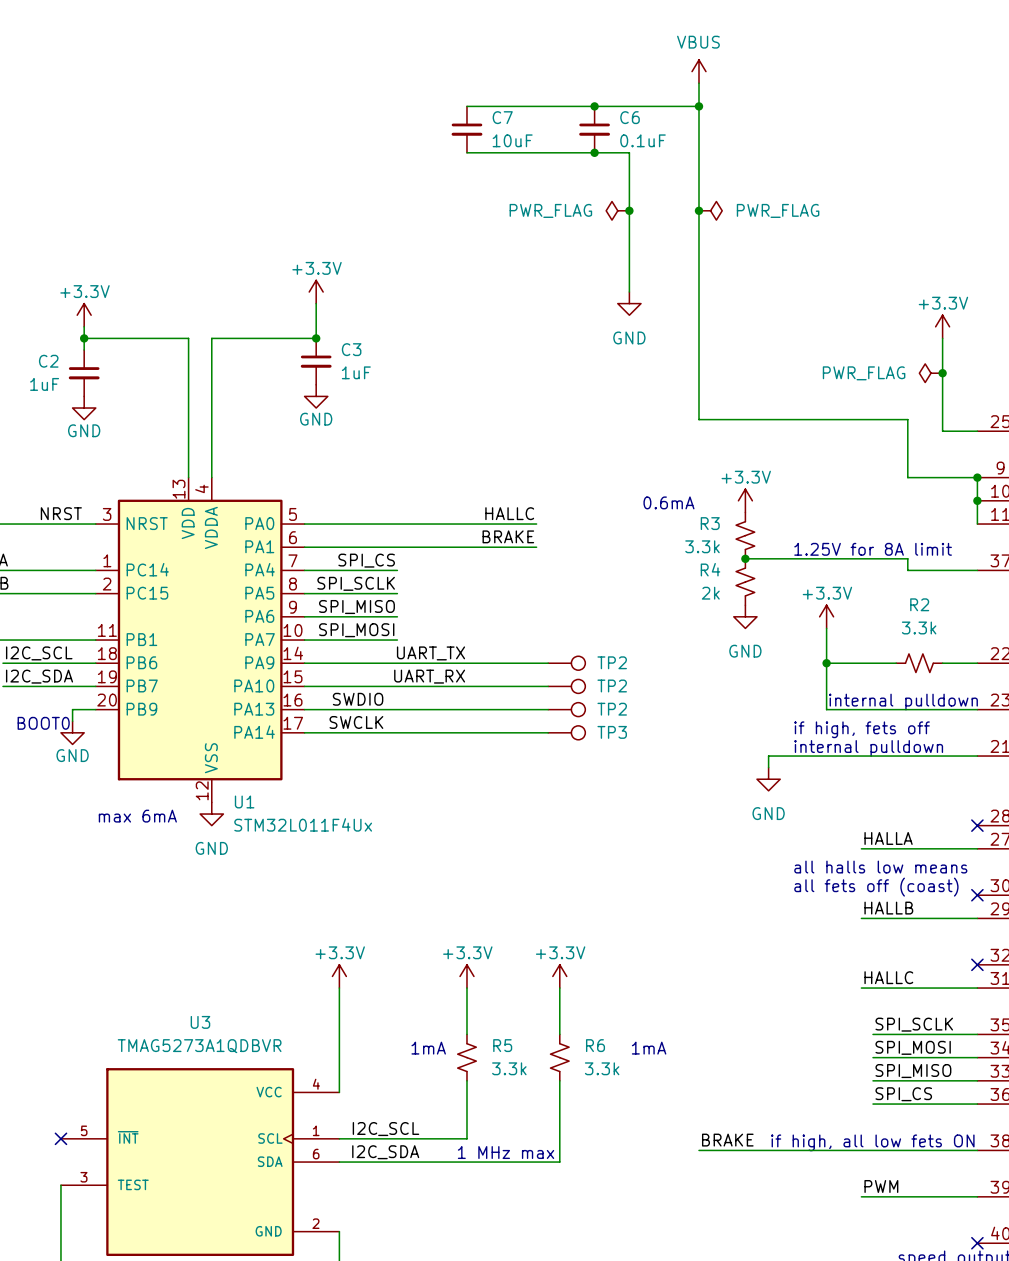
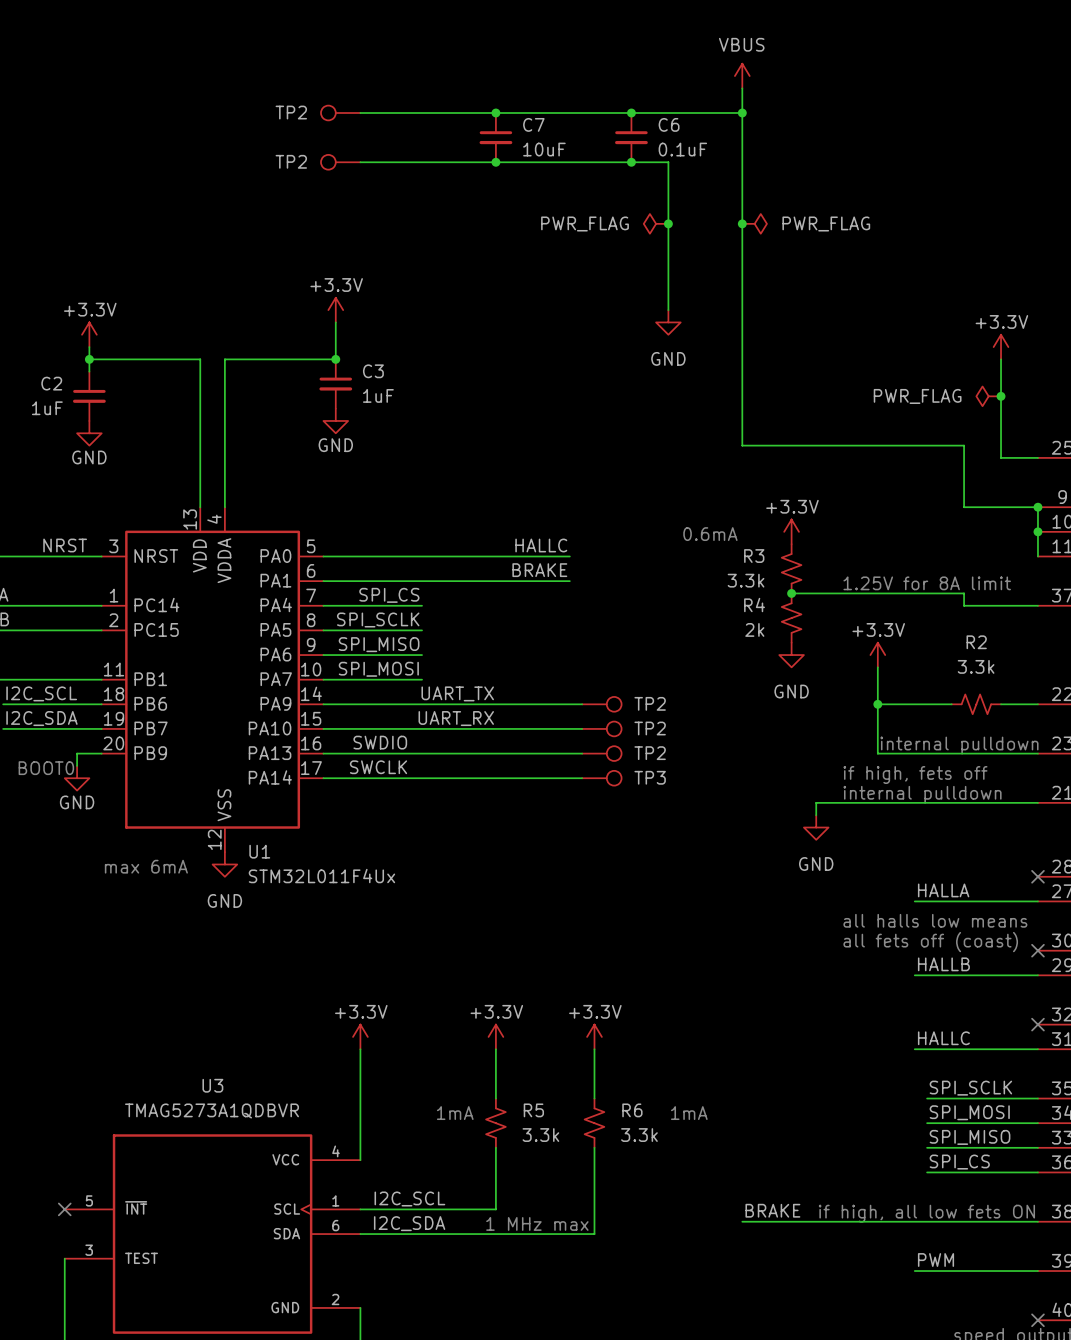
TP2: none -> (340, 112)
wire: none -> (360, 112) (495, 112)
junction: none -> (495, 112)
TP2: none -> (340, 162)
wire: none -> (360, 162) (495, 162)
junction: none -> (495, 162)

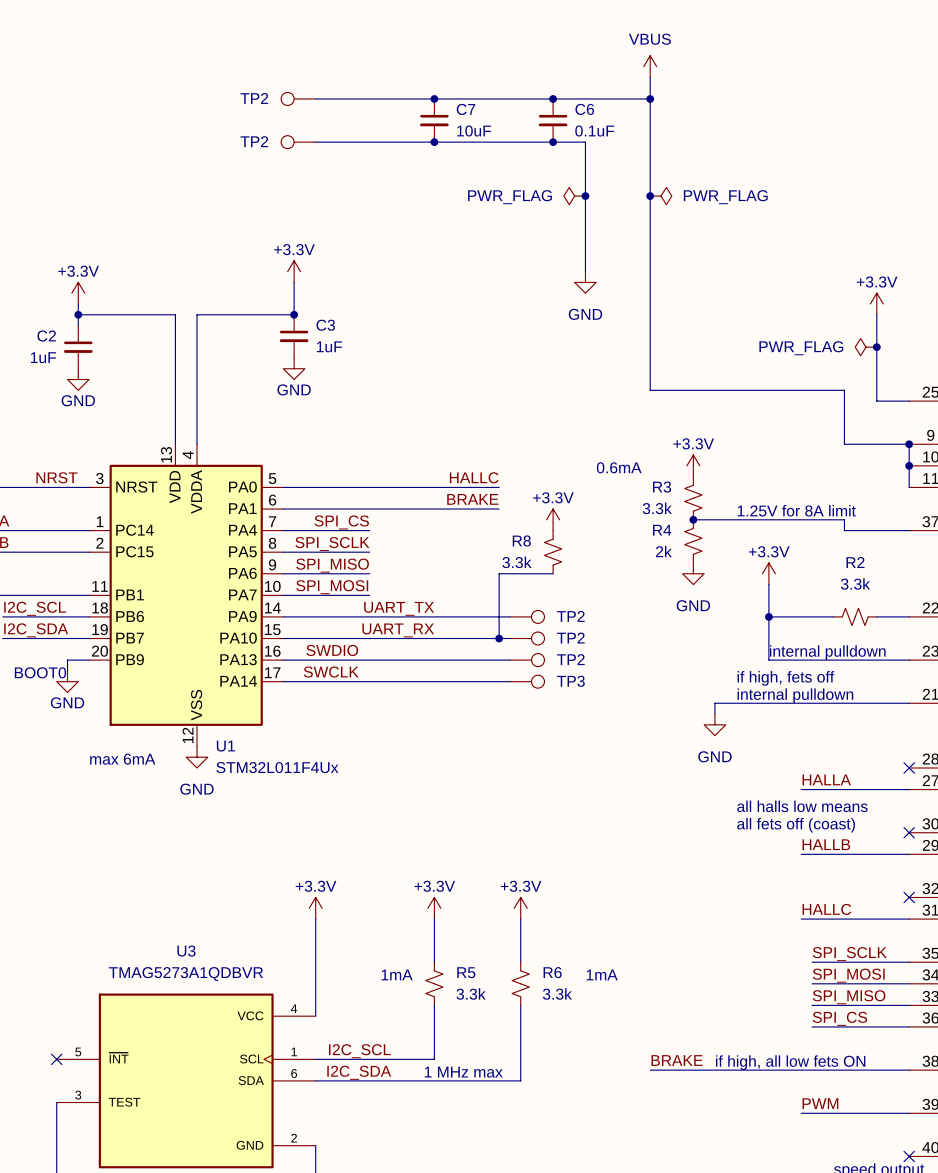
power symbol: none -> +3.3V (553, 519)
R8: none -> 3.3k (553, 552)
wire: none -> (553, 573) (499, 573) (499, 638)
junction: none -> (499, 638)

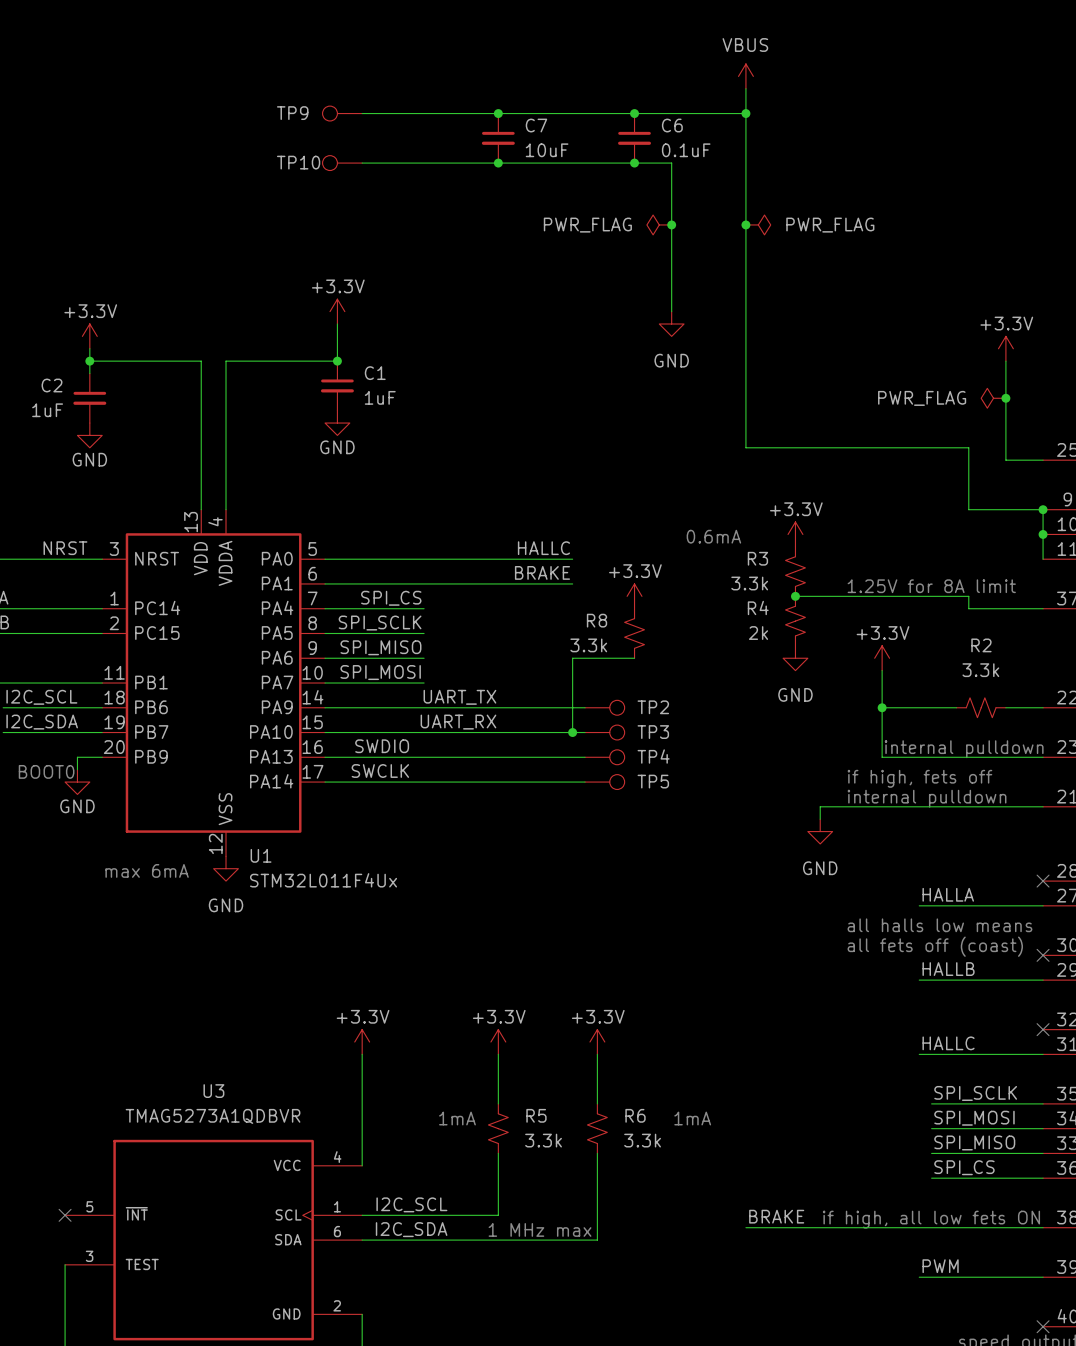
TP2 name: TP2 (254, 98) -> TP9 (292, 113)
TP2 name: TP2 (254, 141) -> TP10 (298, 162)
C3 name: C3 (325, 325) -> C1 (375, 373)
TP2 name: TP2 (570, 638) -> TP3 (653, 732)
TP2 name: TP2 (570, 659) -> TP4 (653, 756)
TP3 name: TP3 (570, 681) -> TP5 (653, 781)

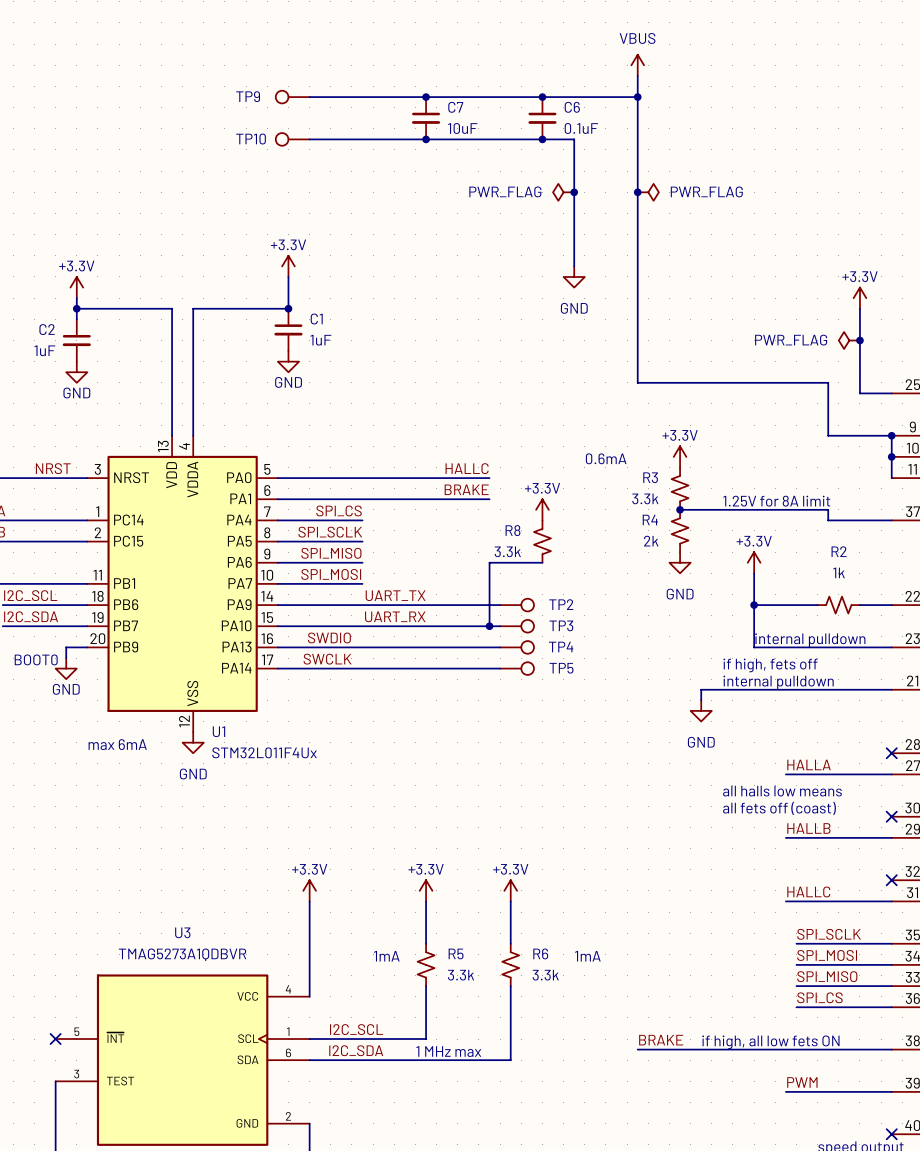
R2 value: 3.3k (980, 670) -> 1k (839, 572)

